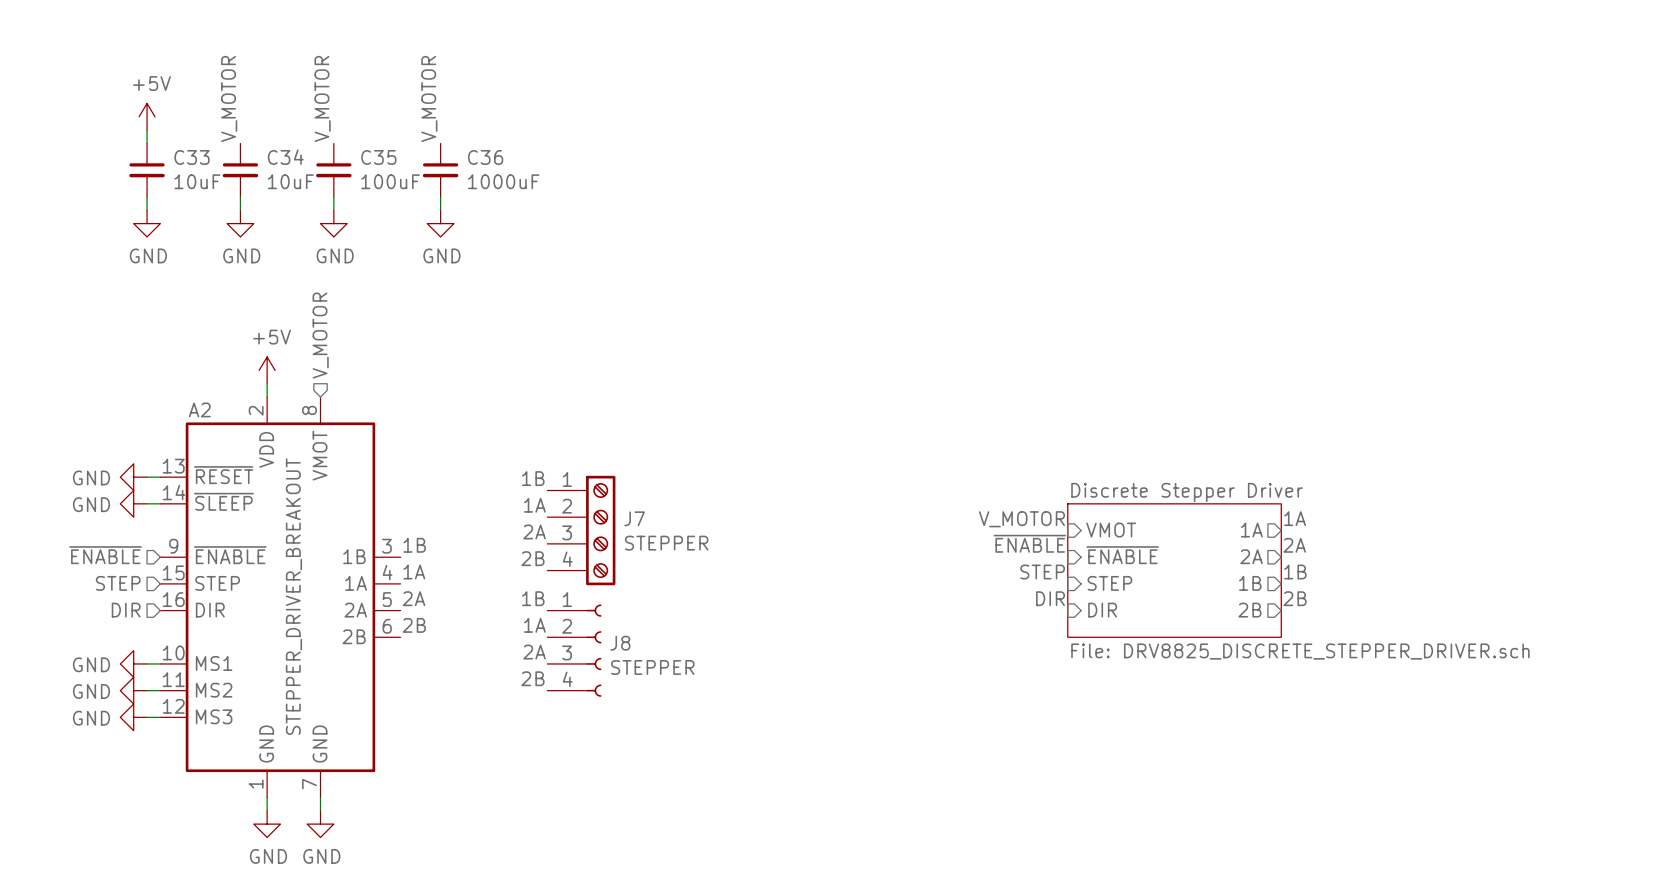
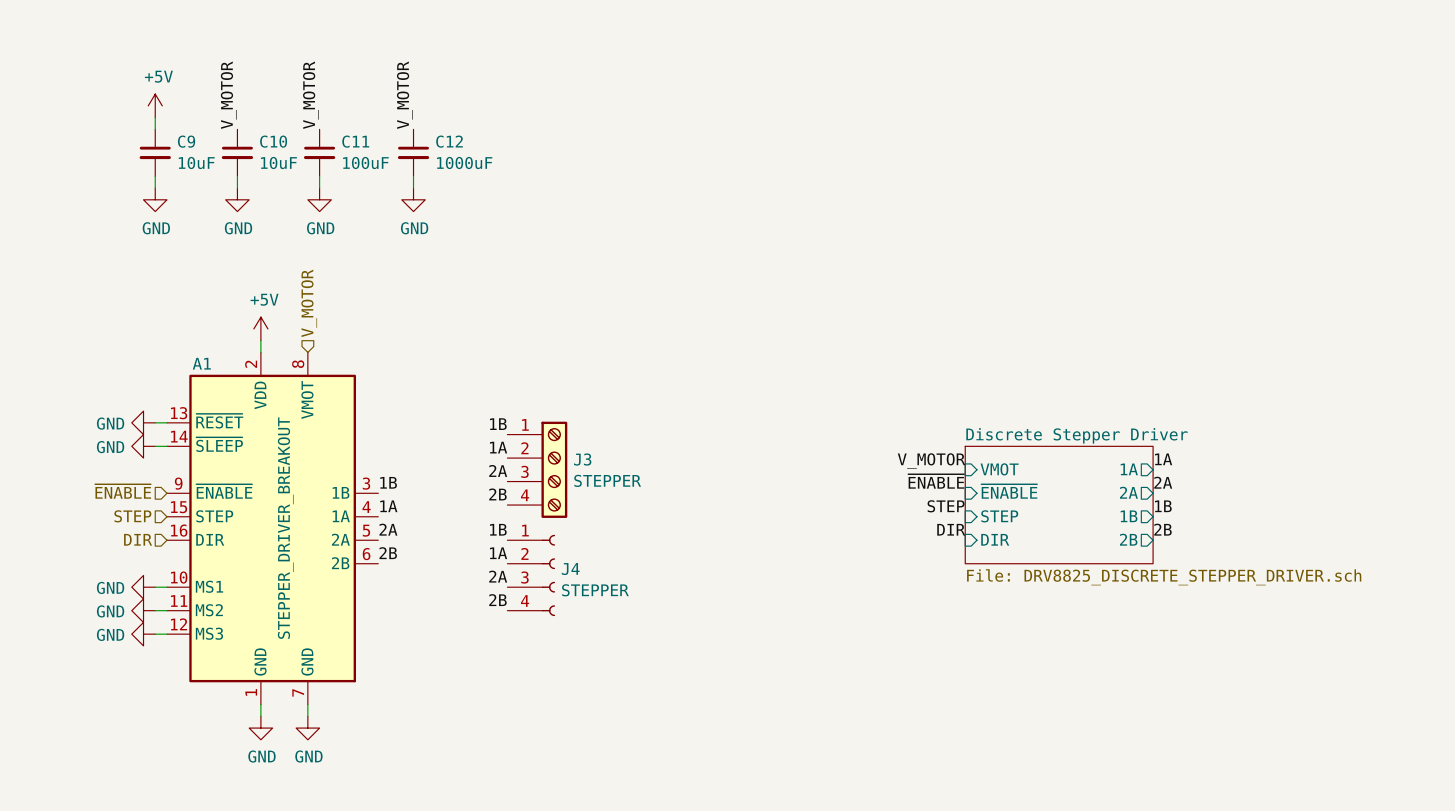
C33 name: C33 (192, 157) -> C9 (186, 141)
C34 name: C34 (285, 157) -> C10 (273, 141)
C35 name: C35 (378, 157) -> C11 (355, 141)
C36 name: C36 (485, 157) -> C12 (449, 141)
A2 name: A2 (199, 409) -> A1 (201, 363)
J7 name: J7 (634, 518) -> J3 (582, 459)
J8 name: J8 (620, 643) -> J4 (570, 569)

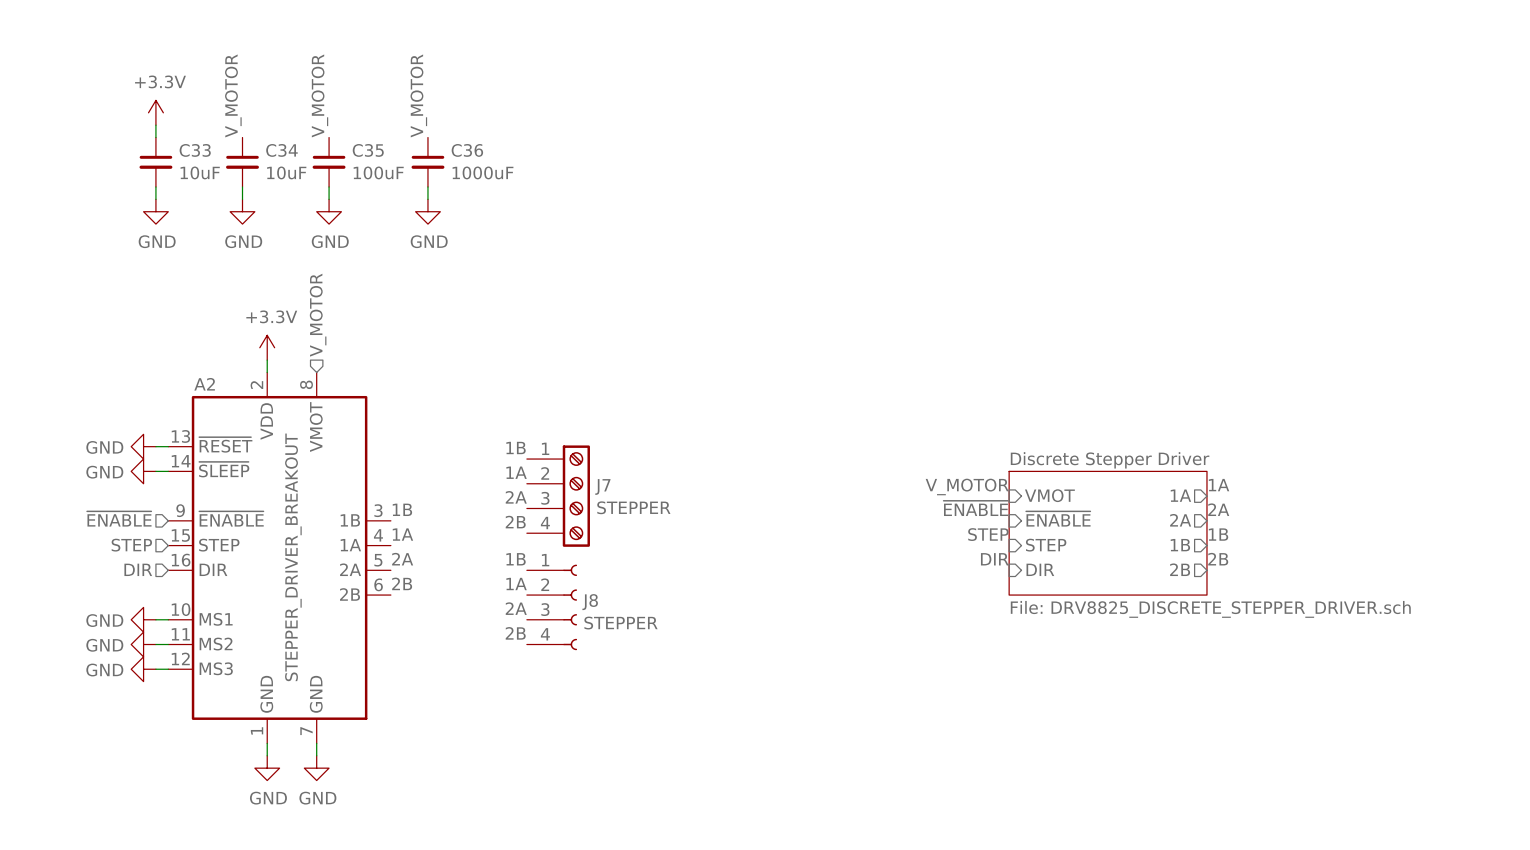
power symbol: +5V (155, 105) -> +3.3V (155, 112)
C9 name: C9 (186, 141) -> C33 (195, 150)
C10 name: C10 (273, 141) -> C34 (281, 150)
C11 name: C11 (355, 141) -> C35 (368, 150)
C12 name: C12 (449, 141) -> C36 (467, 150)
power symbol: +5V (260, 328) -> +3.3V (267, 347)
A1 name: A1 (201, 363) -> A2 (204, 384)
J3 name: J3 (582, 459) -> J7 (602, 486)
J4 name: J4 (570, 569) -> J8 (590, 602)

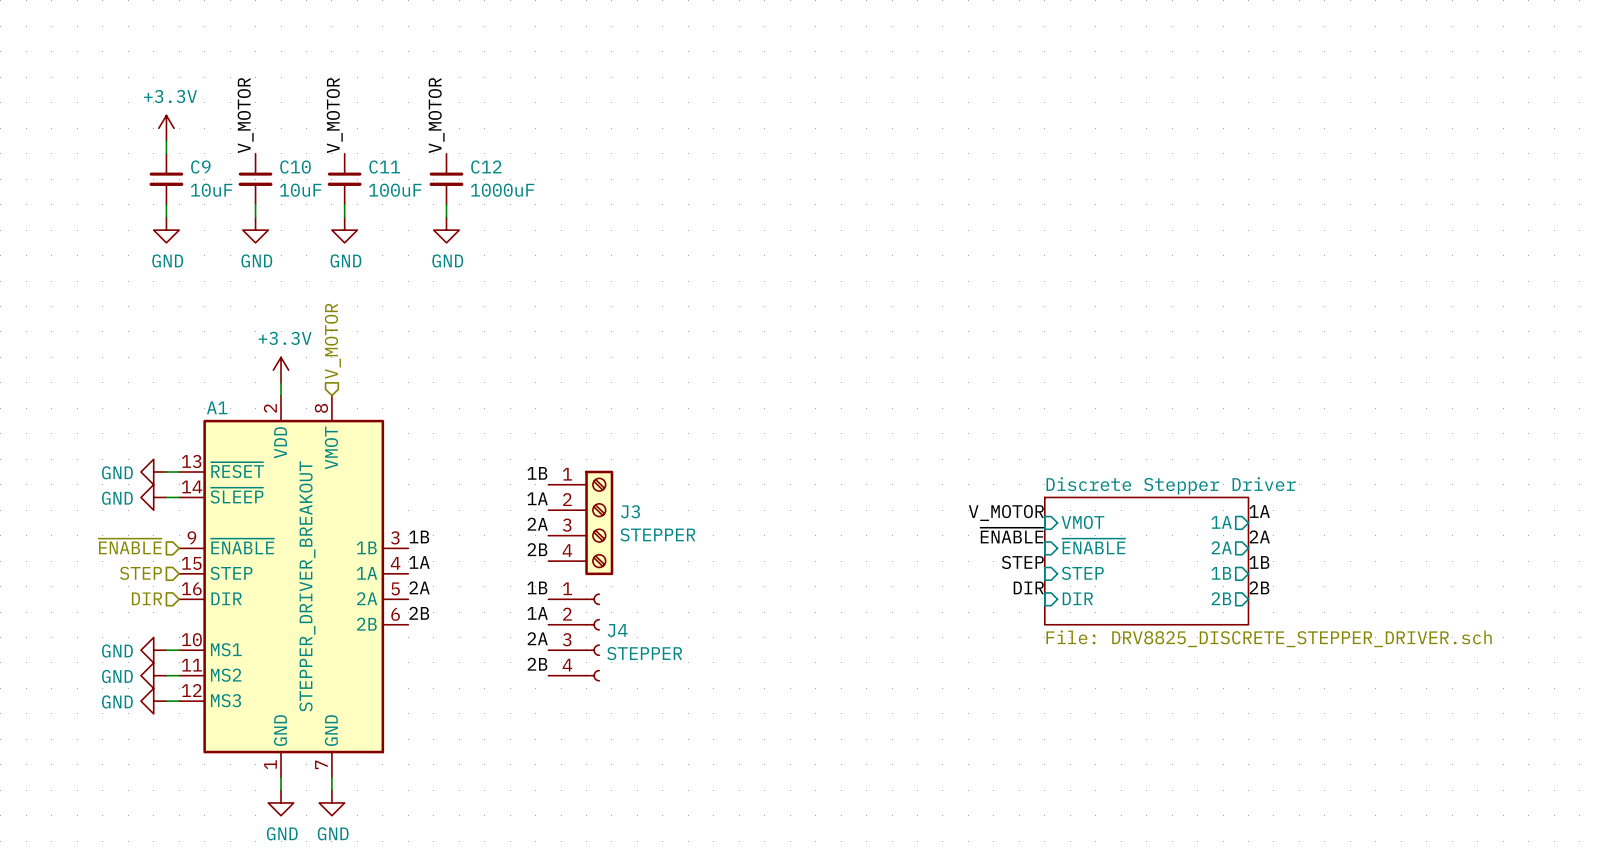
C33 name: C33 (195, 150) -> C9 (200, 167)
C34 name: C34 (281, 150) -> C10 (295, 167)
C35 name: C35 (368, 150) -> C11 (384, 167)
C36 name: C36 (467, 150) -> C12 (486, 167)
A2 name: A2 (204, 384) -> A1 (217, 407)
J7 name: J7 (602, 486) -> J3 (630, 511)
J8 name: J8 (590, 602) -> J4 (617, 630)

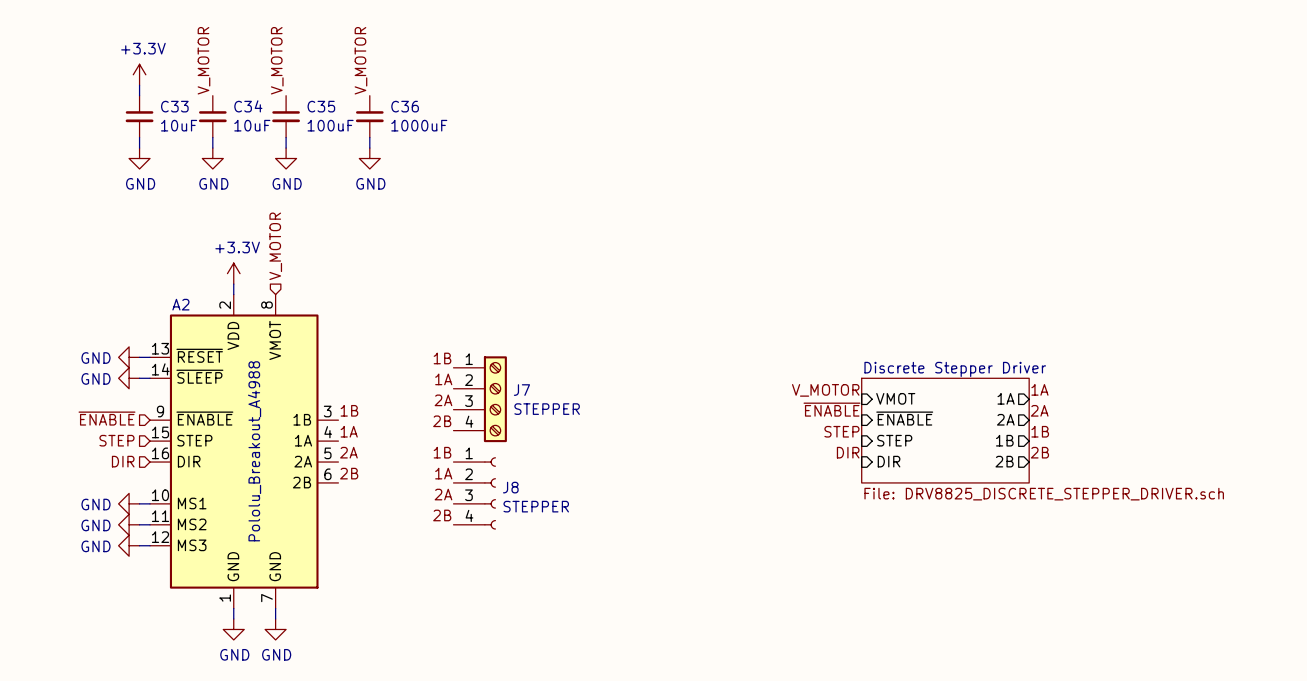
C9 name: C9 (200, 167) -> C33 (174, 106)
C10 name: C10 (295, 167) -> C34 (248, 106)
C11 name: C11 (384, 167) -> C35 (321, 106)
C12 name: C12 (486, 167) -> C36 (405, 106)
A1 name: A1 (217, 407) -> A2 (180, 304)
J3 name: J3 (630, 511) -> J7 (521, 390)
A1 value: STEPPER_DRIVER_BREAKOUT (307, 586) -> Pololu_Breakout_A4988 (254, 451)
J4 name: J4 (617, 630) -> J8 (510, 487)

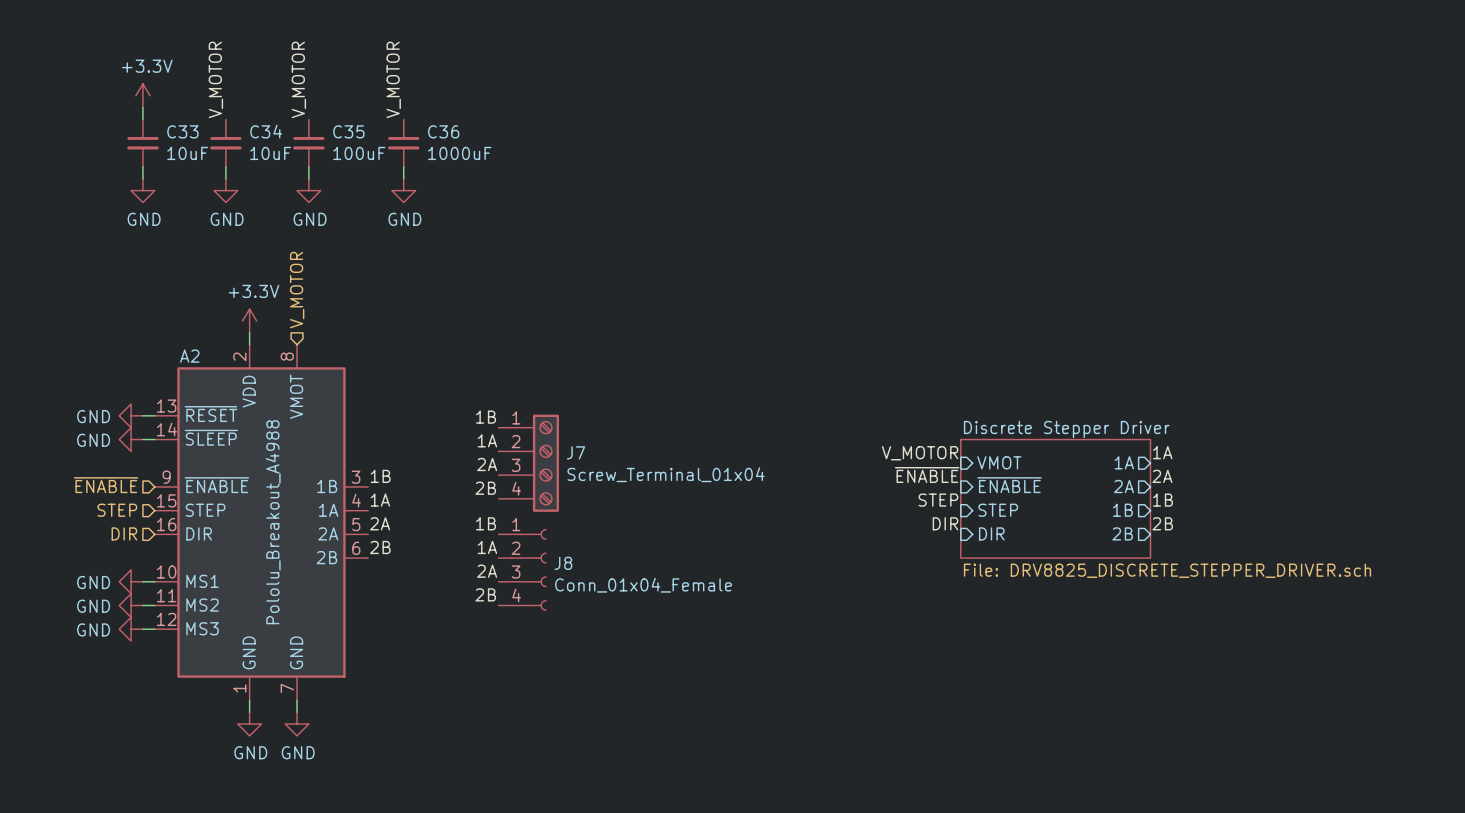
J7 value: STEPPER (547, 409) -> Screw_Terminal_01x04 (666, 474)
J8 value: STEPPER (536, 506) -> Conn_01x04_Female (643, 585)

